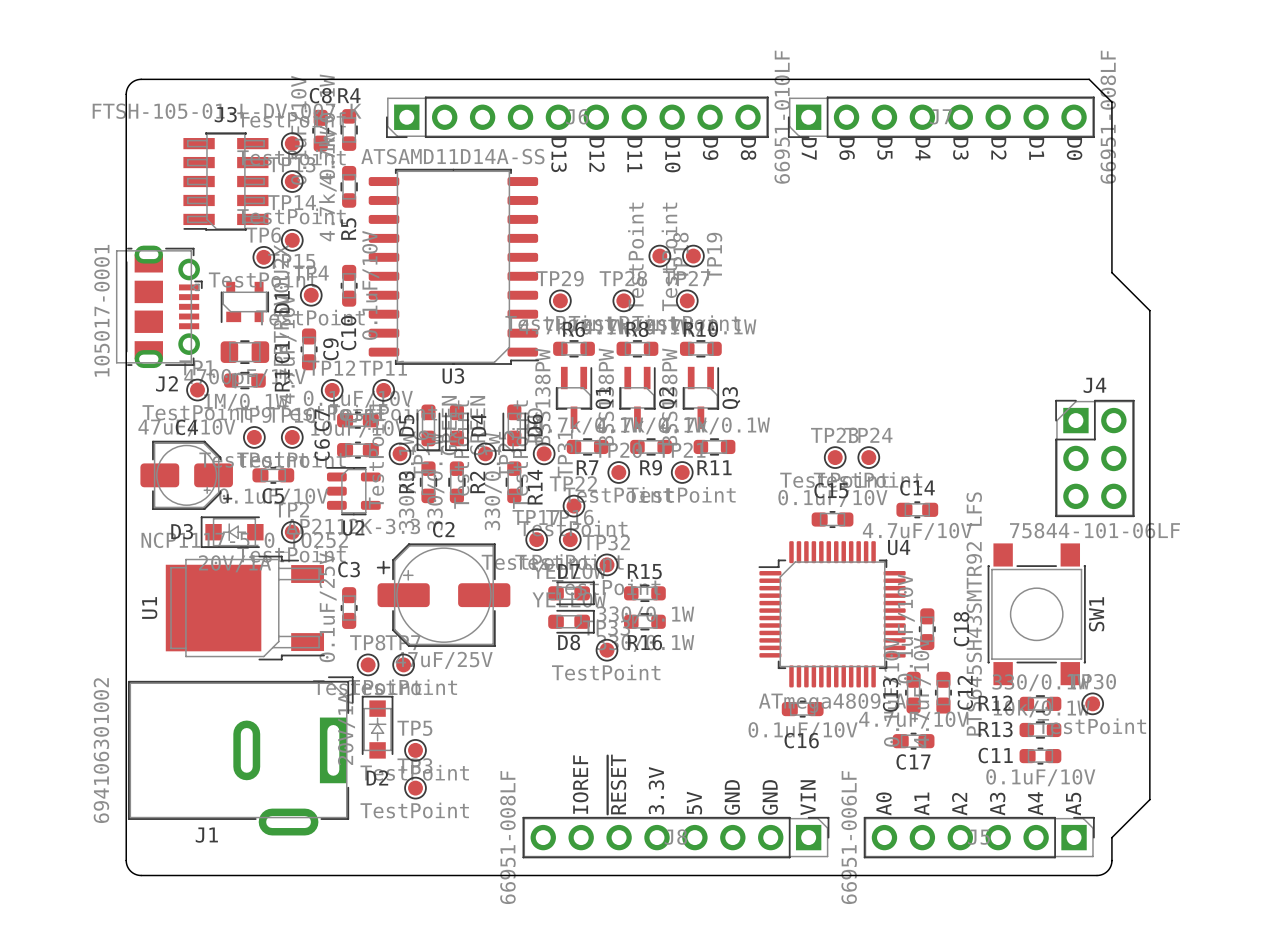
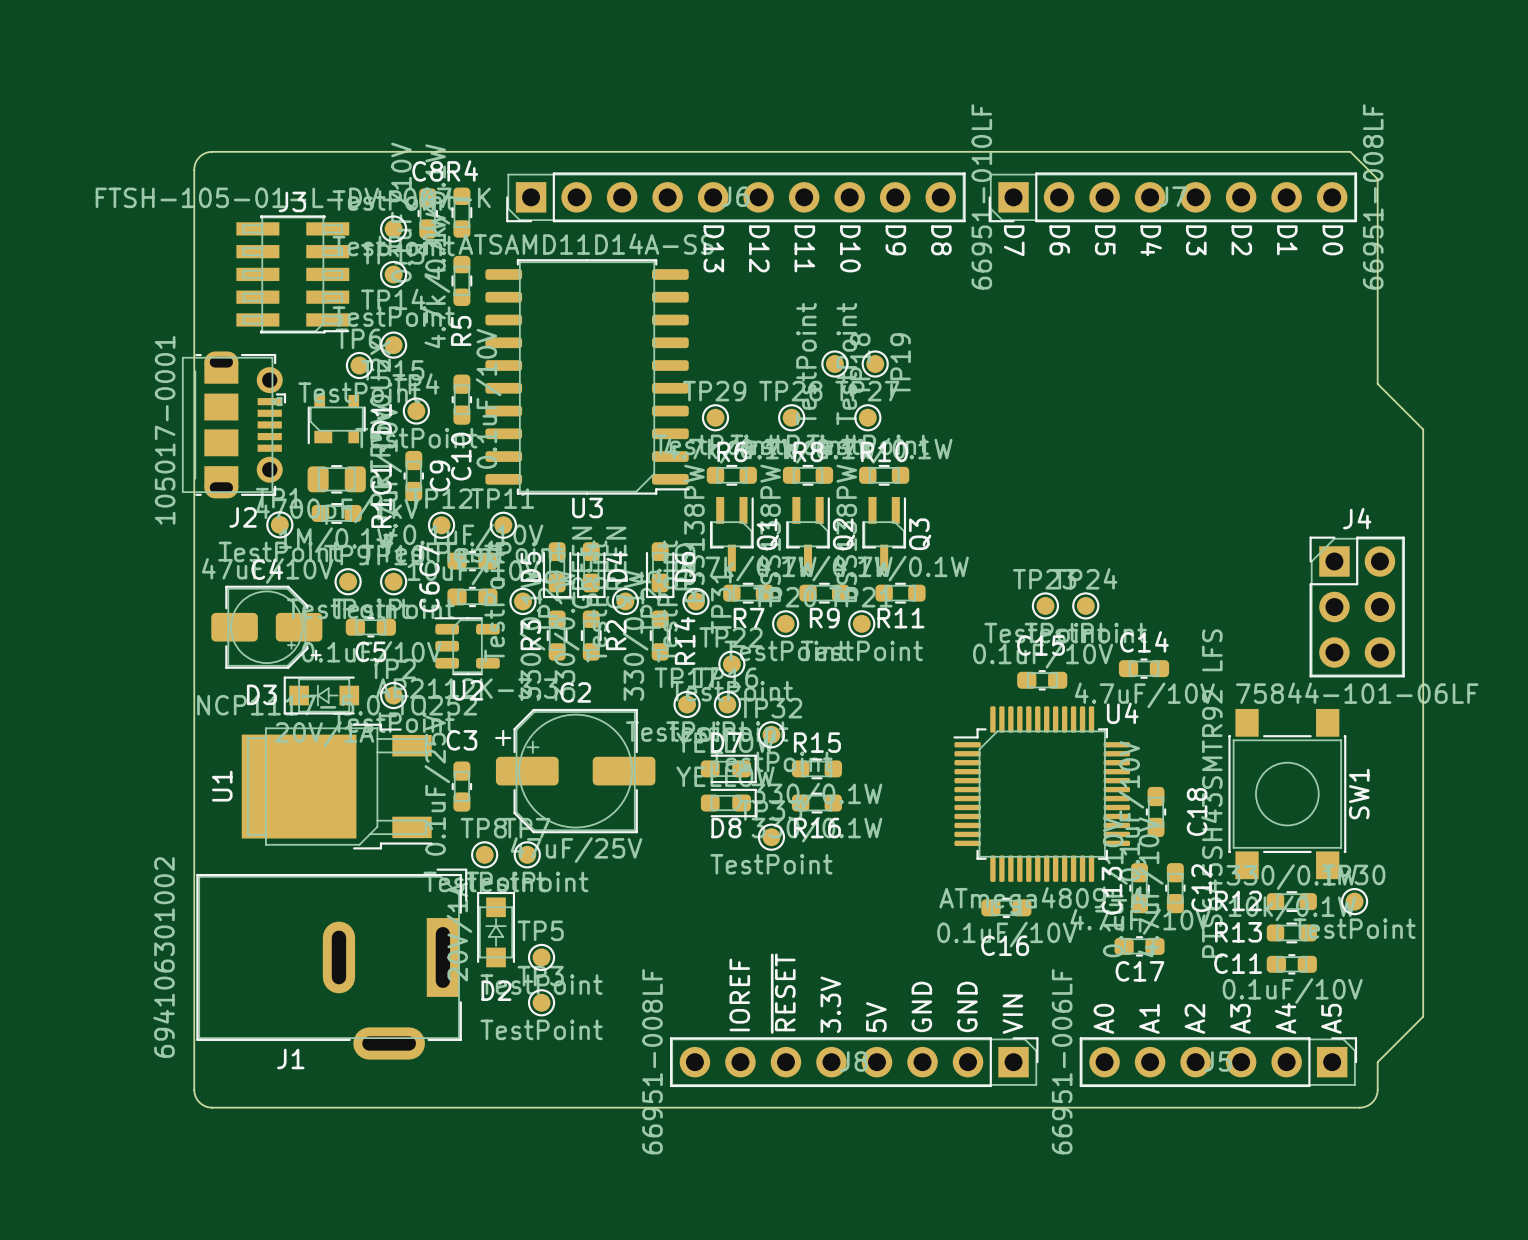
J3 footprint: [183, 132, 269, 231] -> [236, 215, 350, 334]

